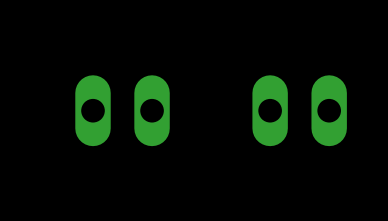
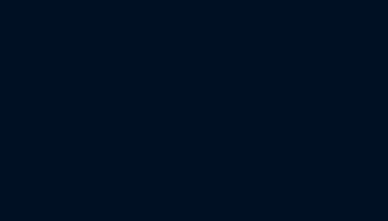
part: (122, 110) -> none
part: (299, 110) -> none

